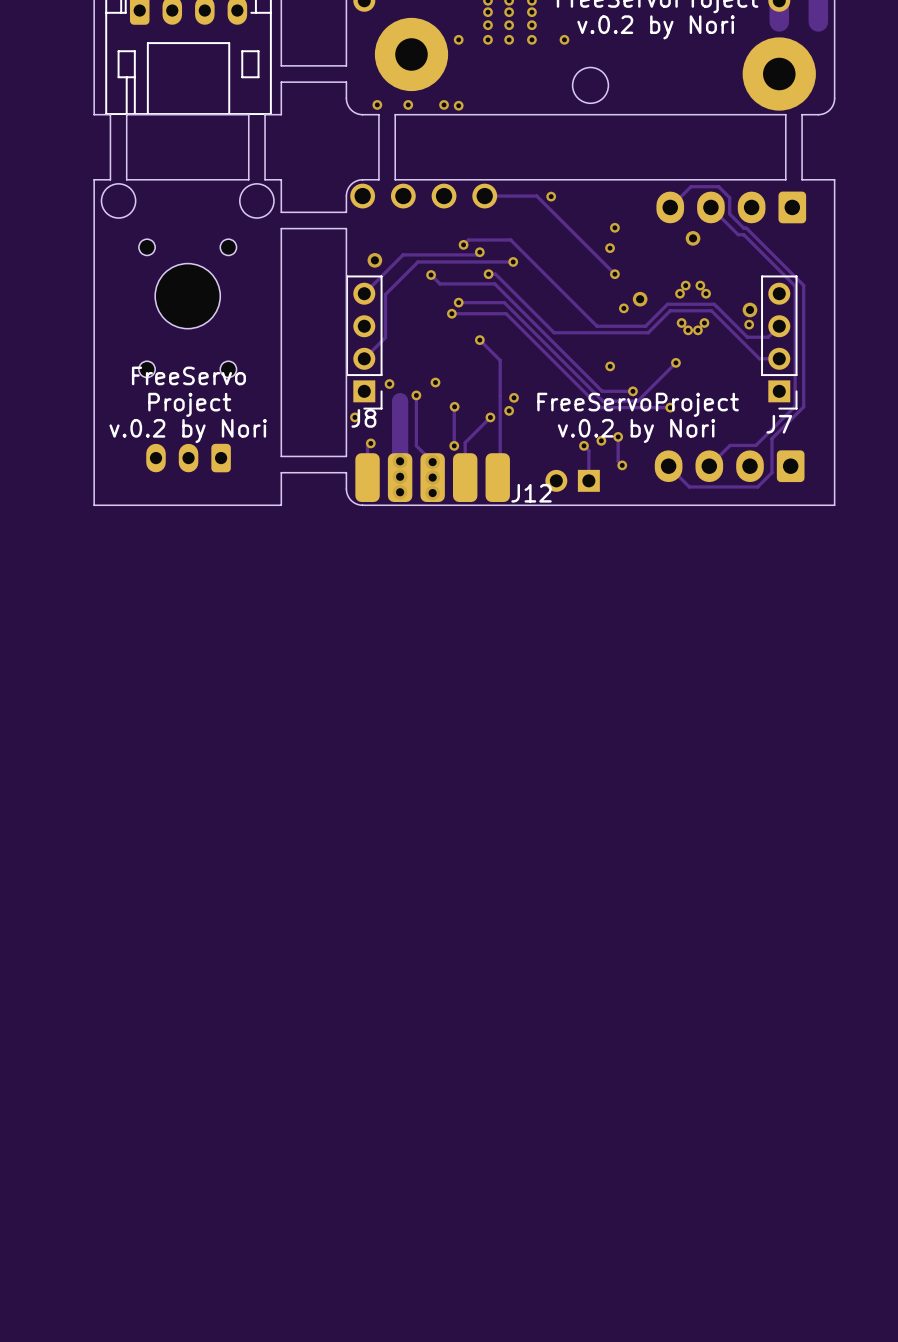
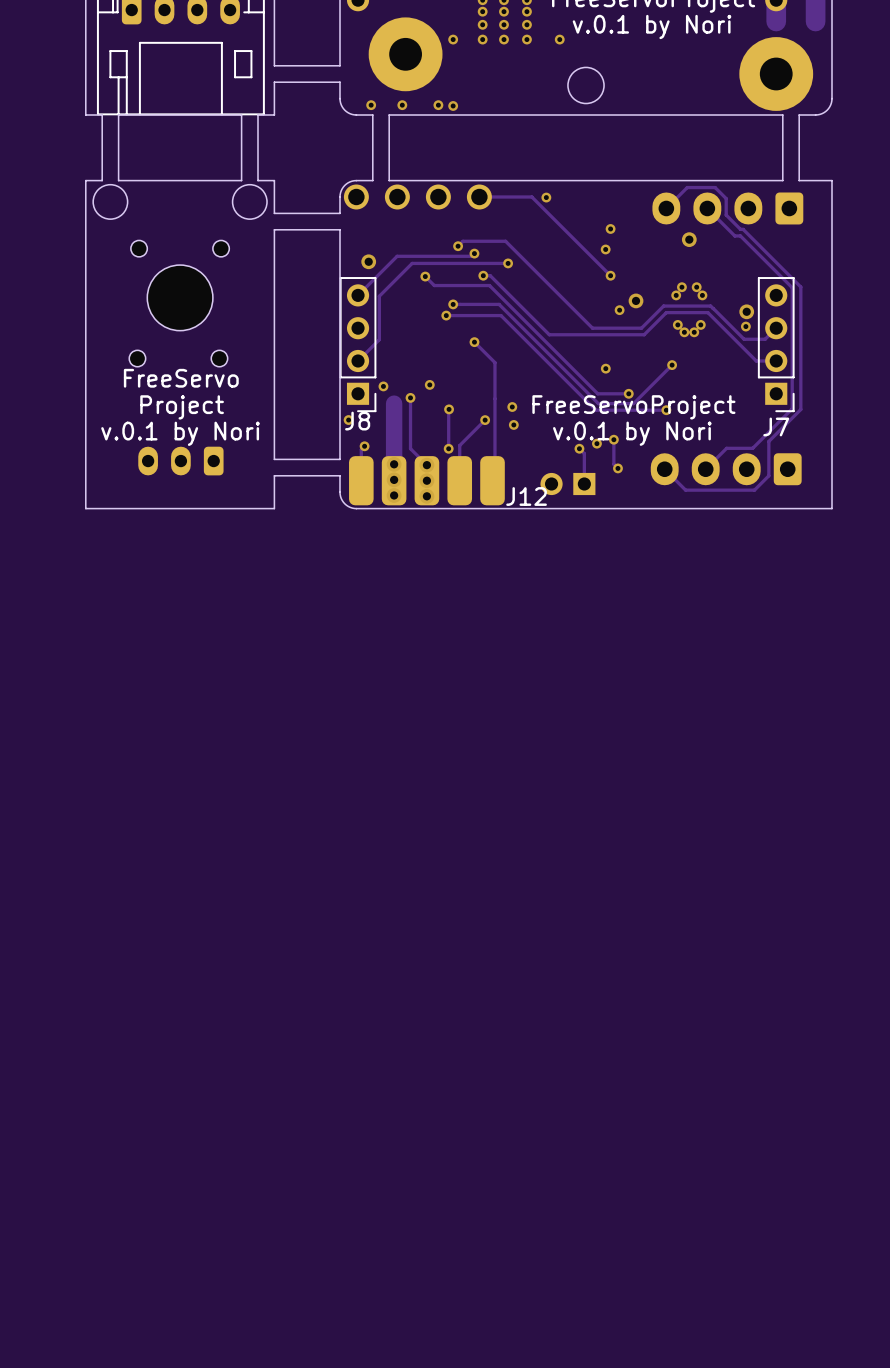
text: v.0.2 by Nori (656, 27) -> v.0.1 by Nori (652, 27)
part footprint: [138, 239, 237, 378] -> [129, 240, 230, 367]
via: (514, 397) -> none
via: none -> (512, 407)
via: (509, 410) -> none
via: none -> (513, 424)
text: v.0.2 by Nori (636, 430) -> v.0.1 by Nori (632, 433)
text: v.0.2 by Nori (188, 431) -> v.0.1 by Nori (180, 433)

